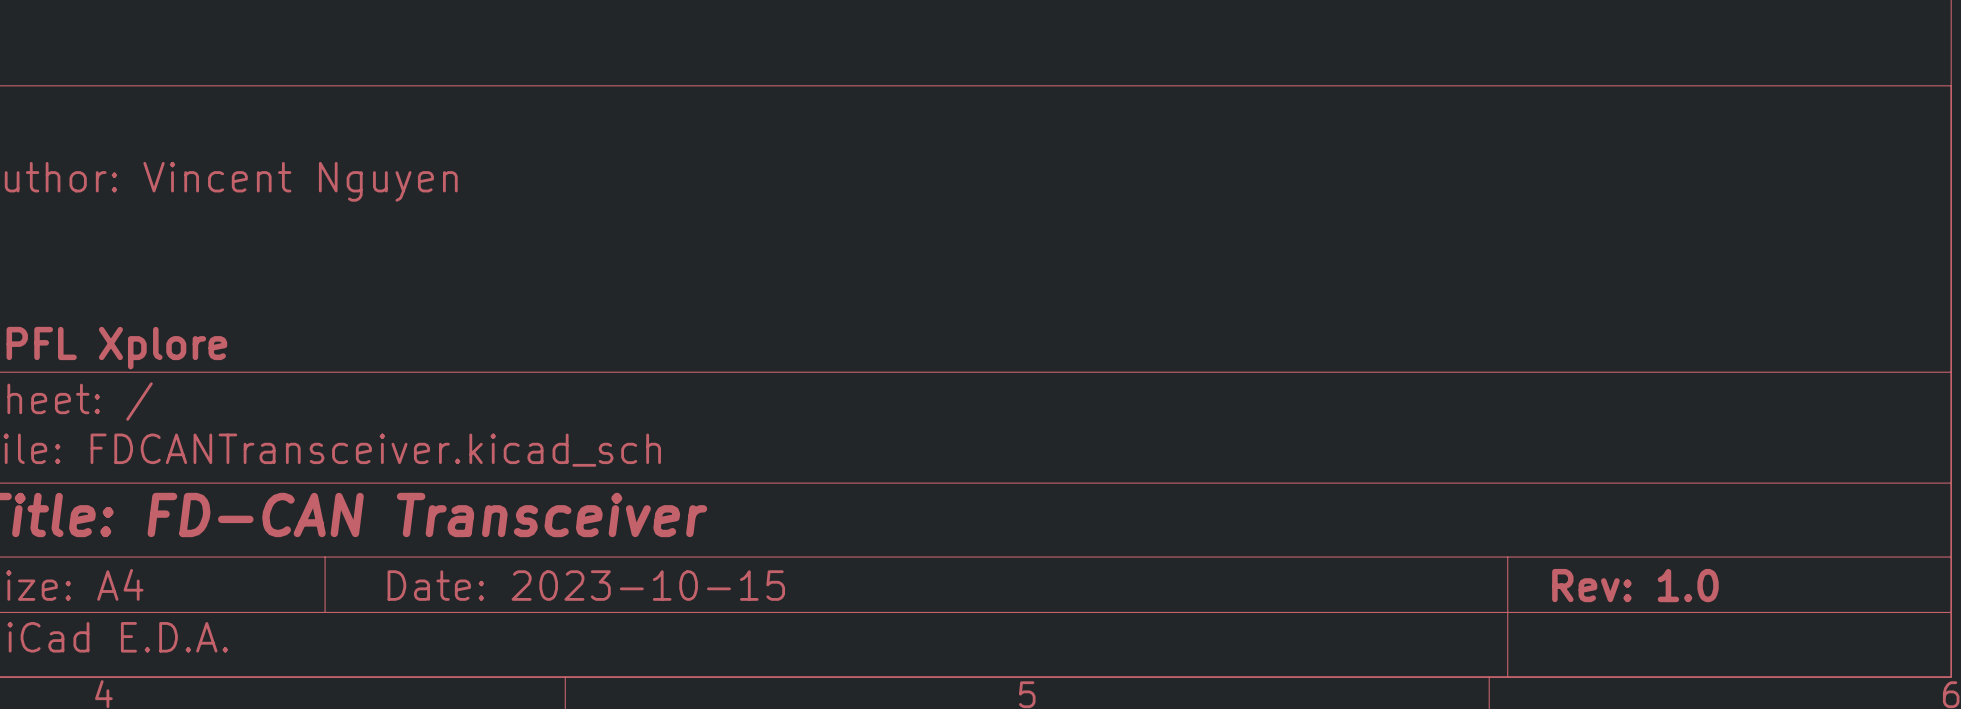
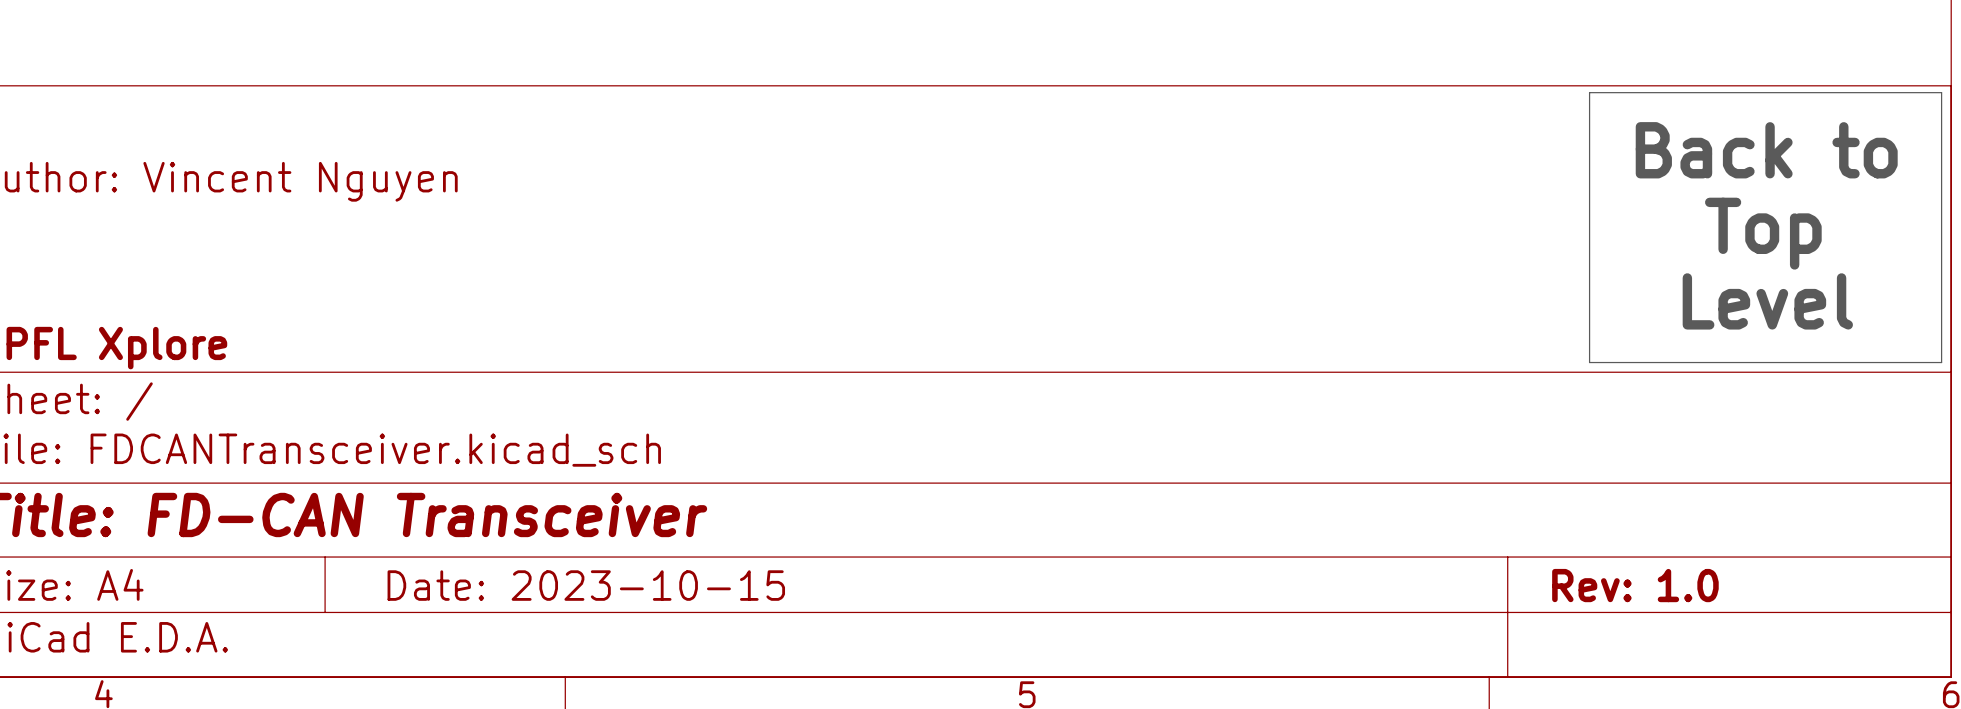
line: none -> (1589, 92) (1941, 92) (1941, 362) (1589, 362) (1589, 92)
text: none -> Back to (1766, 150)
text: none -> Top (1763, 233)
text: none -> Level (1767, 301)

